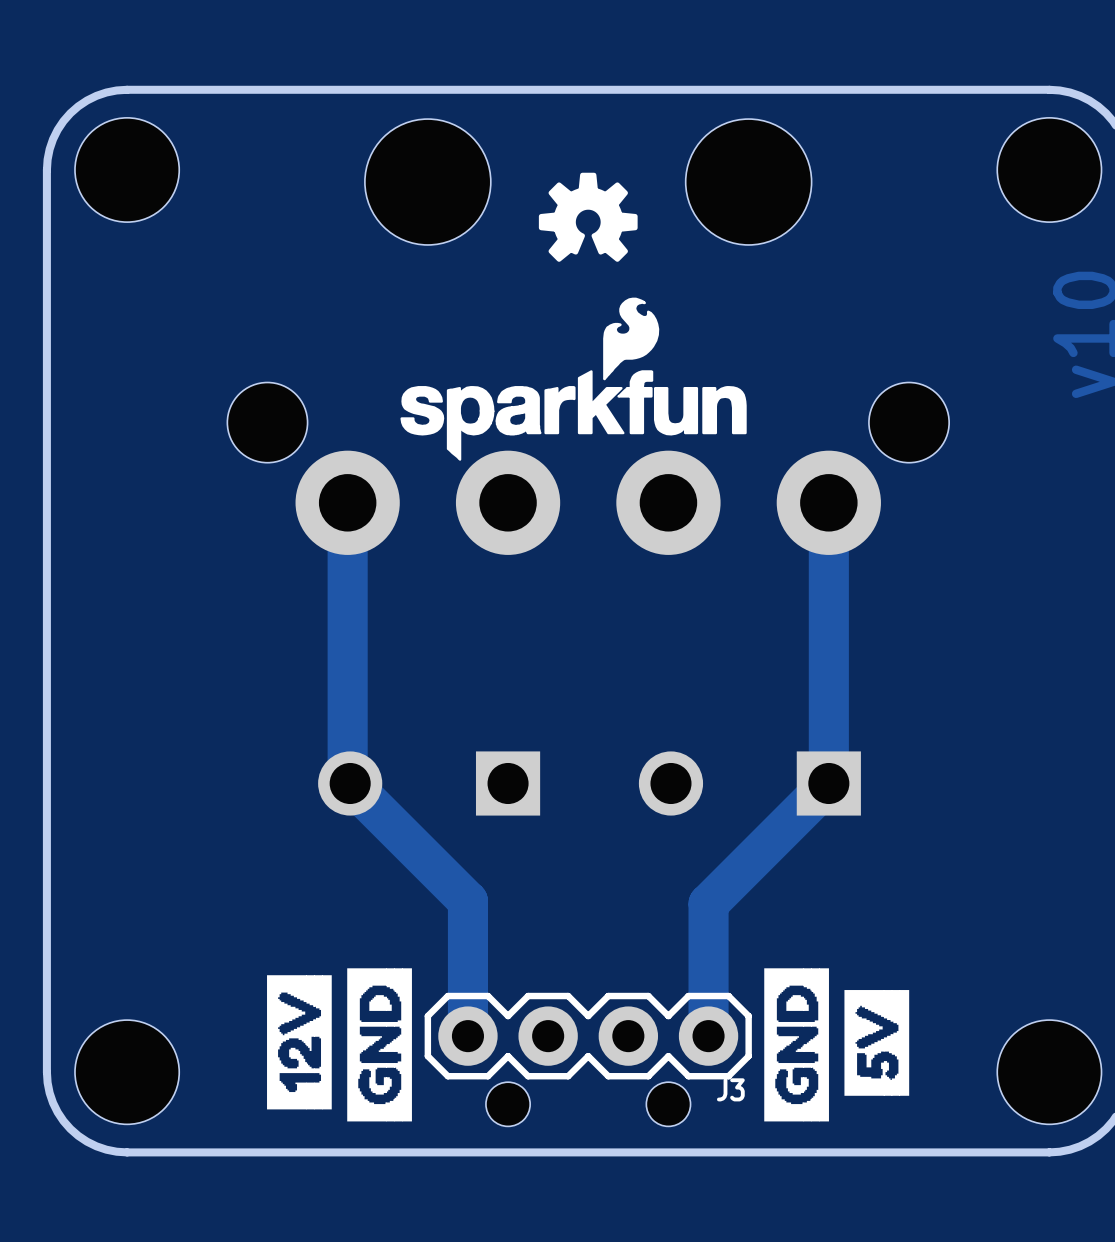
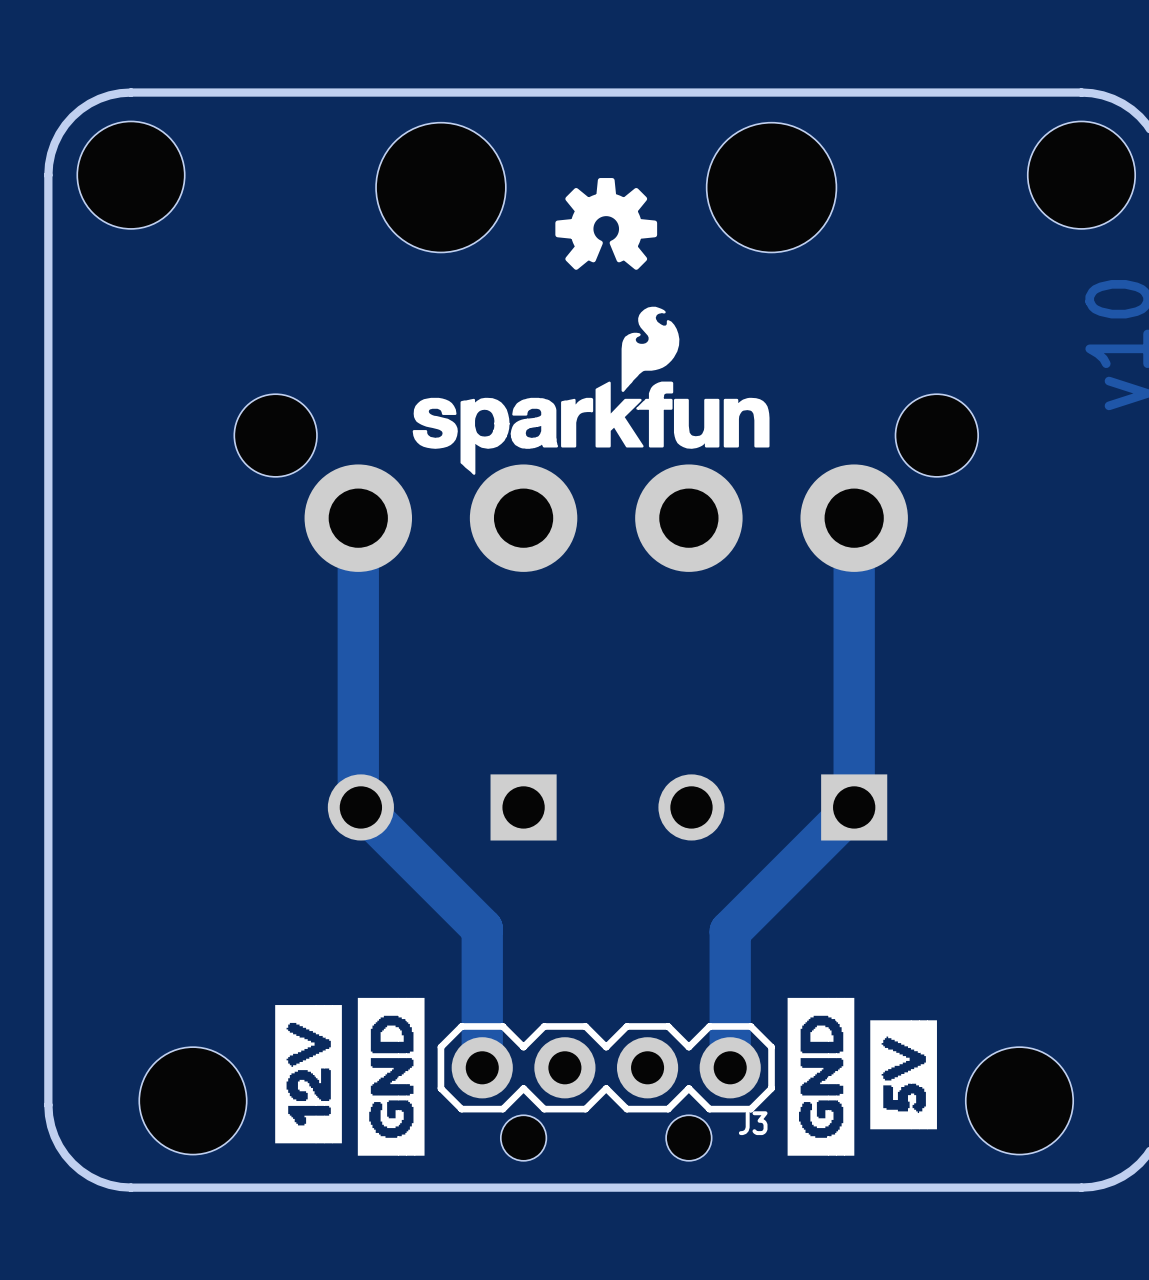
part position: (127, 1072) -> (192, 1100)
part position: (1049, 1072) -> (1019, 1100)

